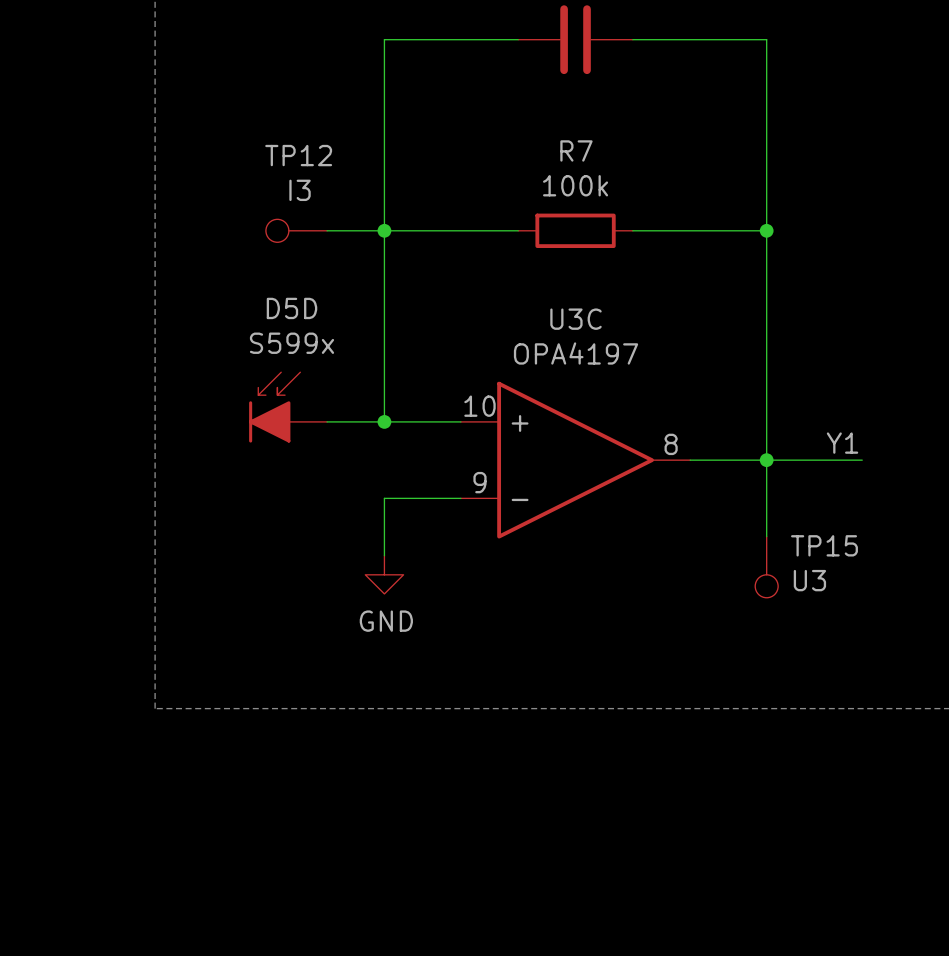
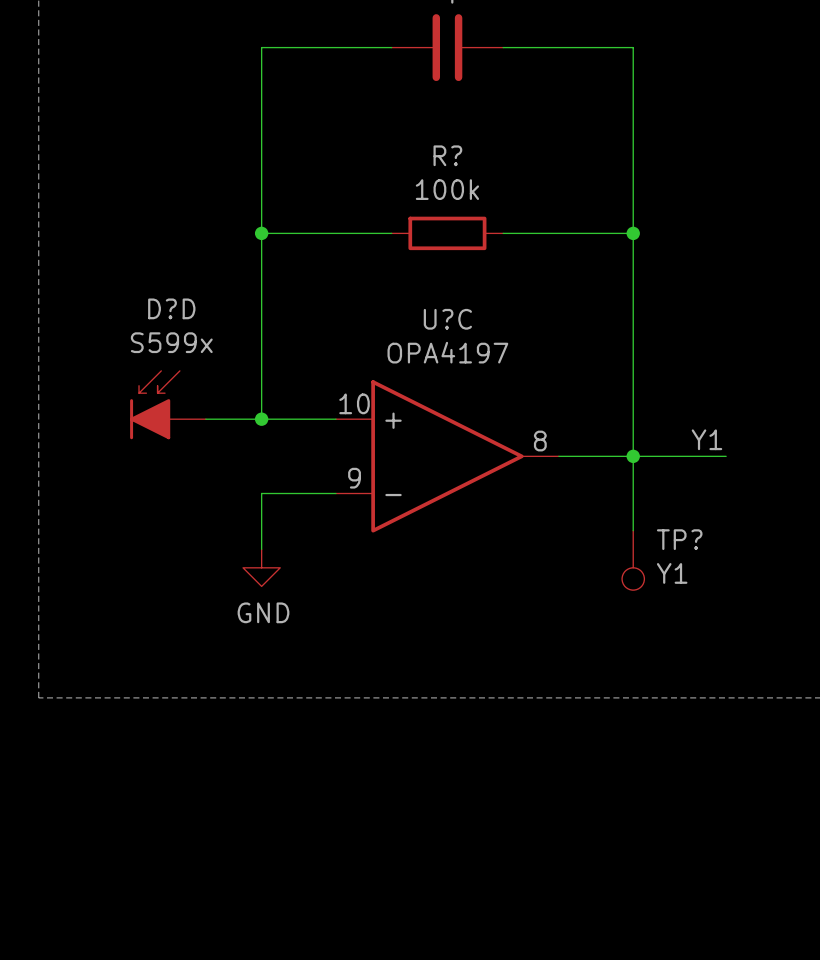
R7 name: R7 (576, 150) -> R? (447, 155)
TP12: I3 (296, 230) -> none
wire: (327, 230) (384, 230) -> none
D5D name: D5D (292, 308) -> D?D (171, 308)
U3C name: U3C (576, 319) -> U?C (447, 319)
TP15 name: TP15 (824, 545) -> TP? (679, 539)
TP15 value: U3 (809, 580) -> Y1 (672, 573)

